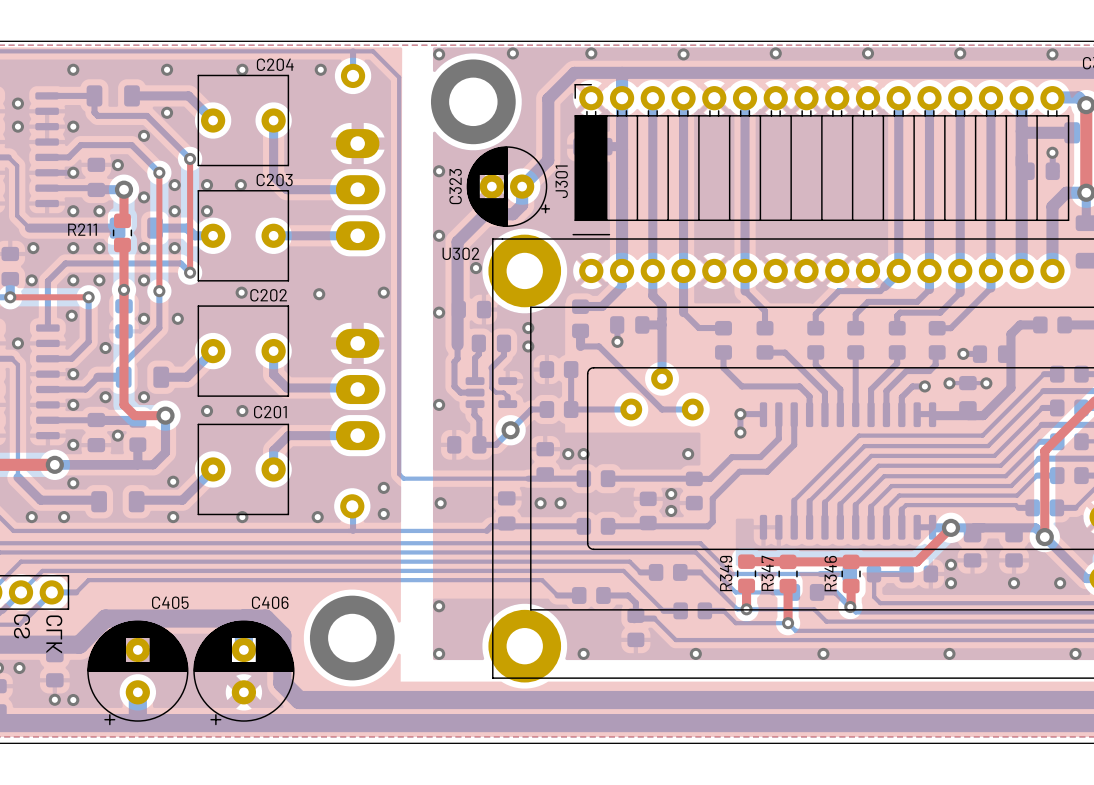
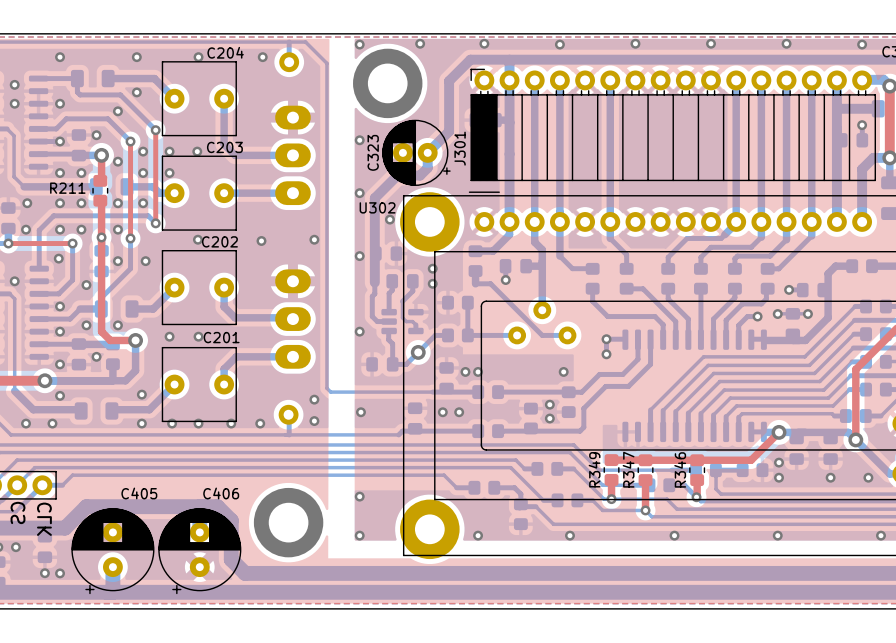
via: none -> (172, 423)
via: none -> (231, 423)

